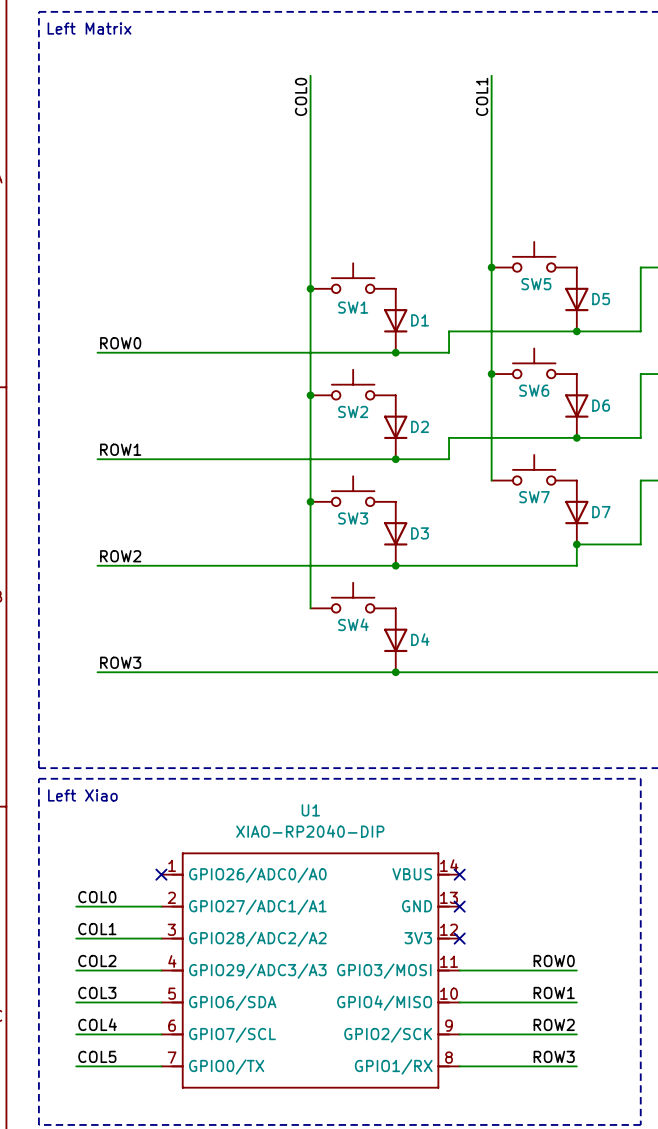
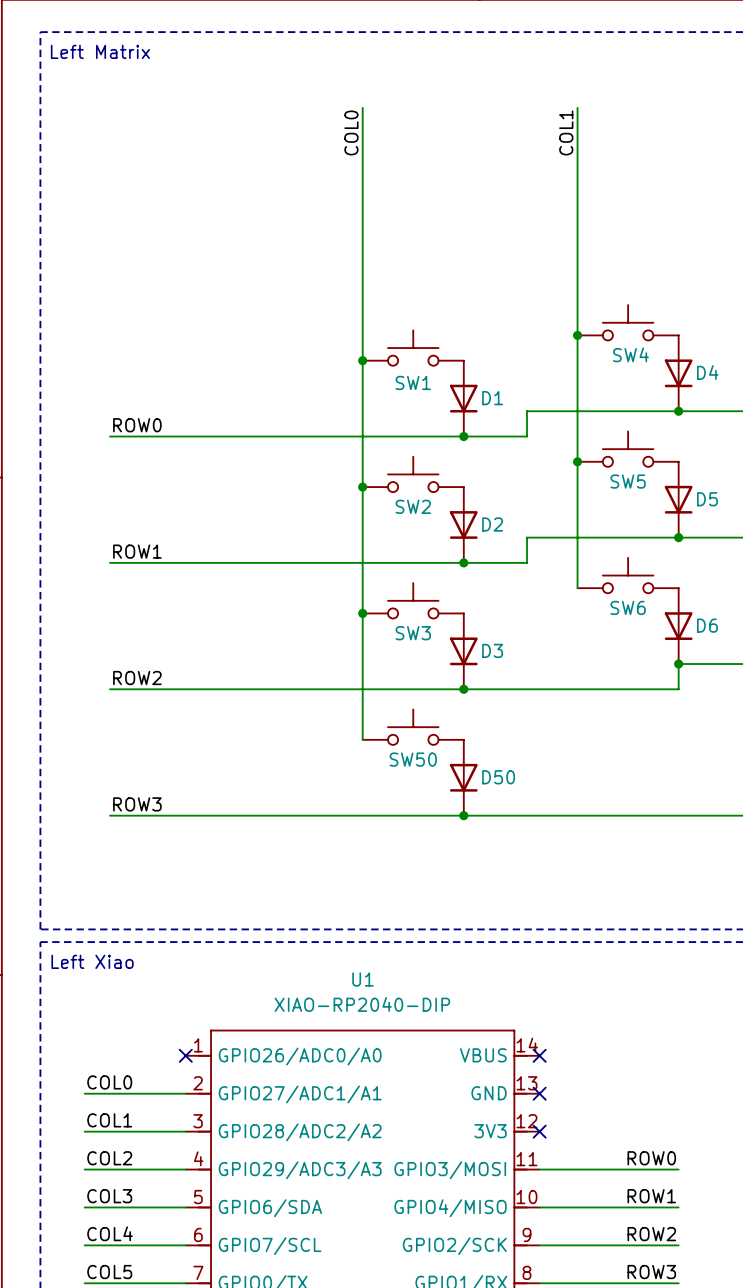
SW5 name: SW5 (536, 284) -> SW4 (630, 354)
D5 name: D5 (601, 299) -> D4 (707, 372)
SW6 name: SW6 (534, 390) -> SW5 (628, 481)
D6 name: D6 (601, 405) -> D5 (707, 499)
SW7 name: SW7 (534, 497) -> SW6 (628, 607)
D7 name: D7 (601, 512) -> D6 (707, 625)
SW4 name: SW4 (353, 624) -> SW50 (413, 759)
D4 name: D4 (420, 639) -> D50 (498, 777)

